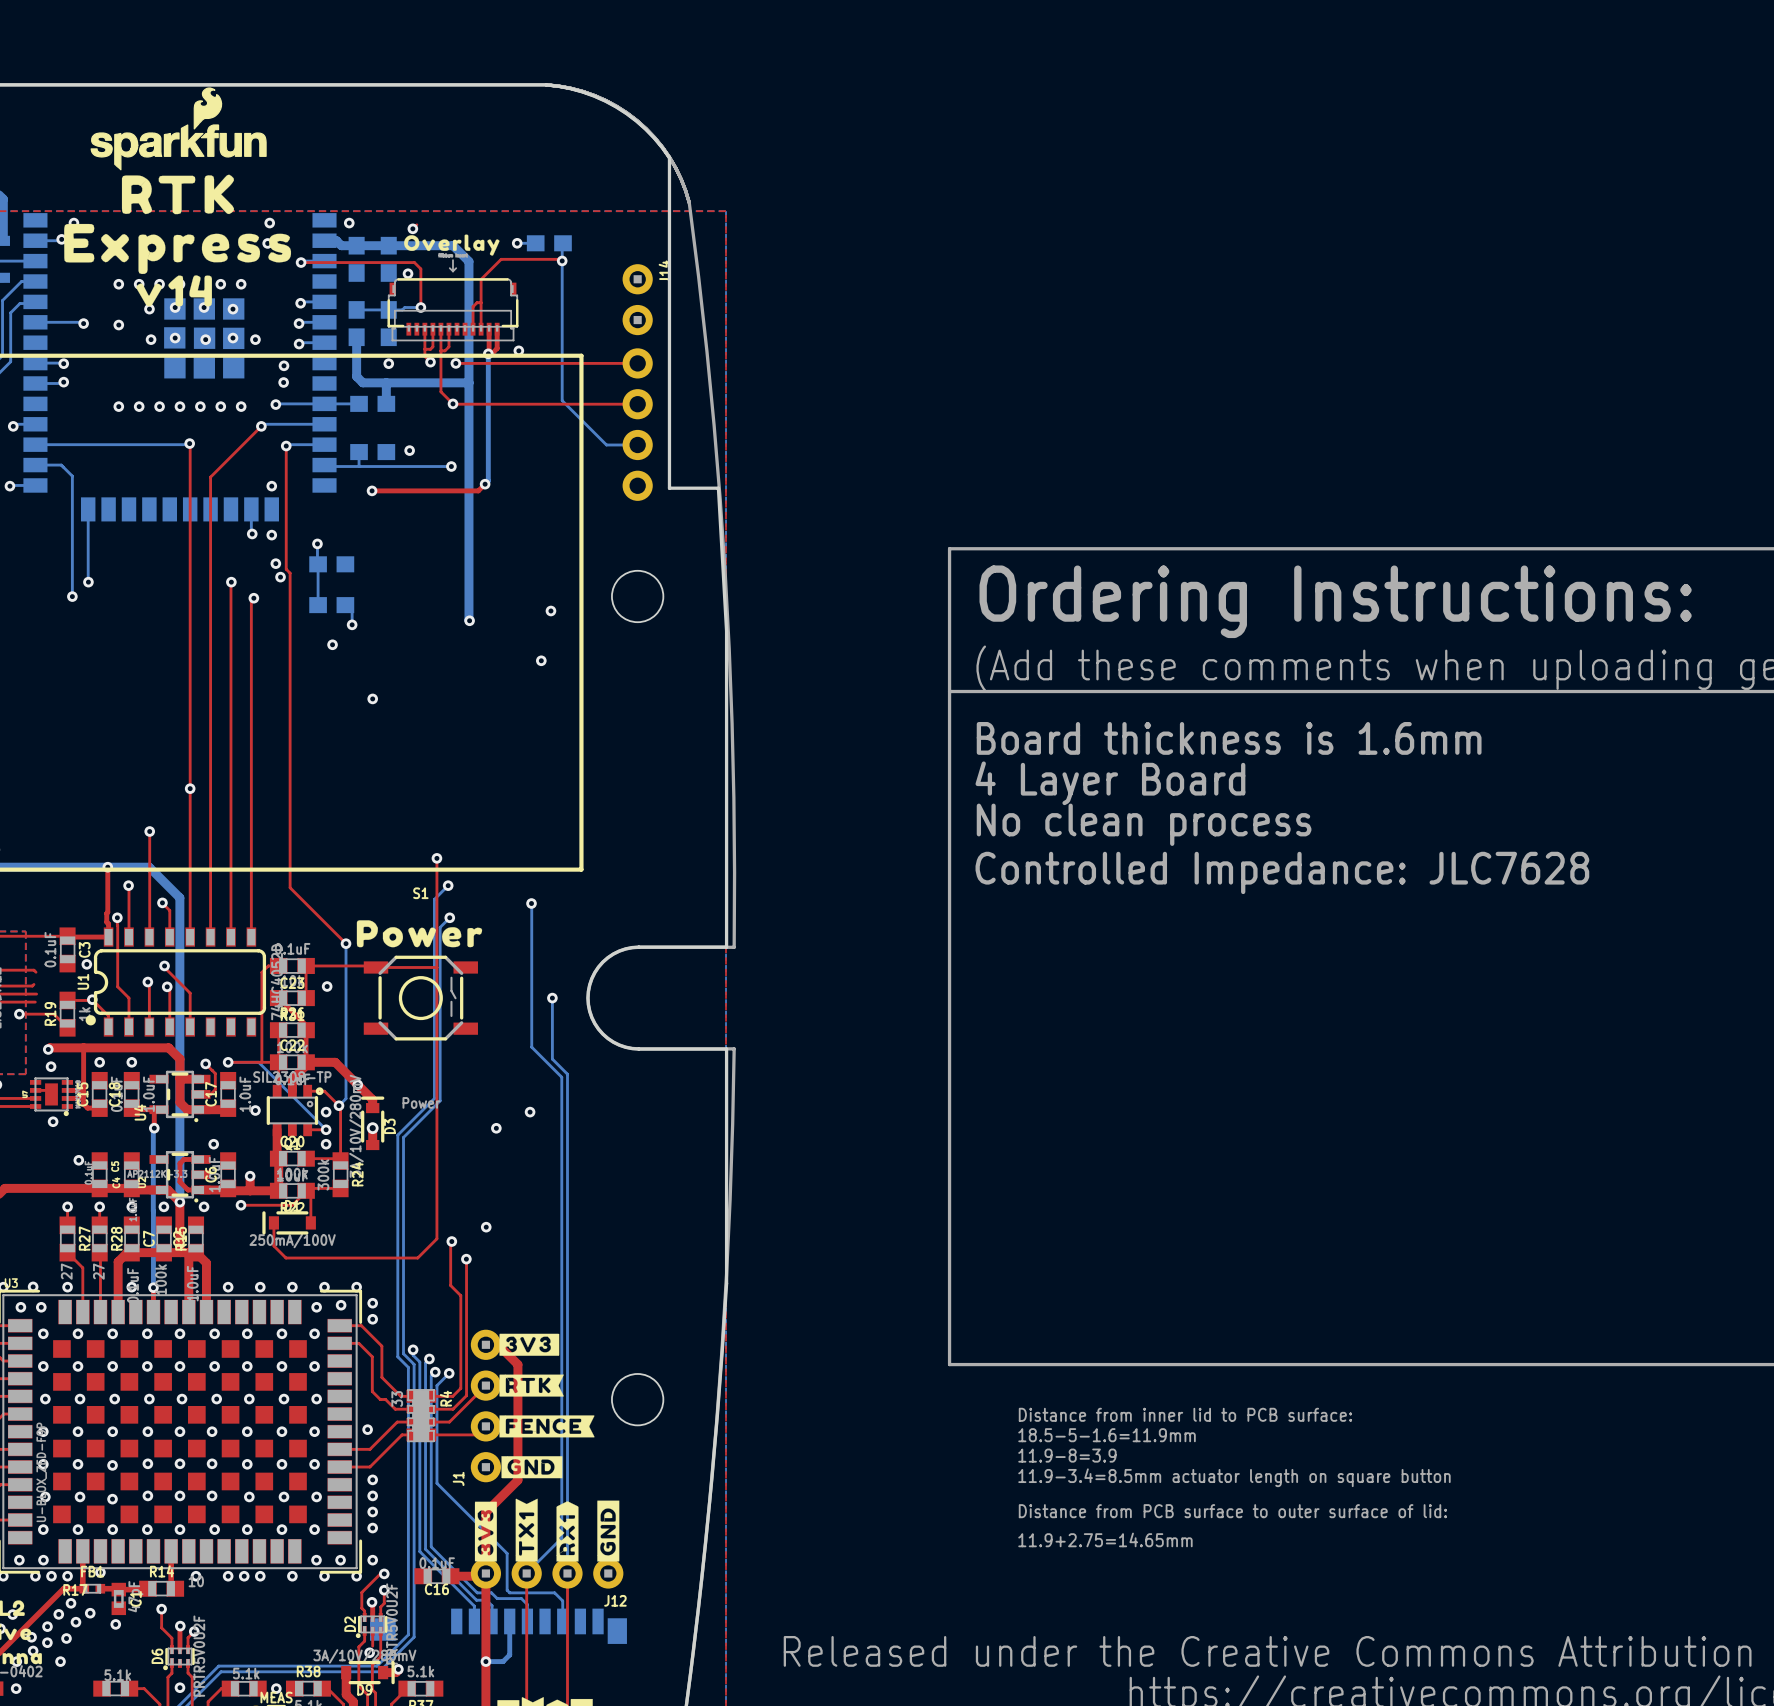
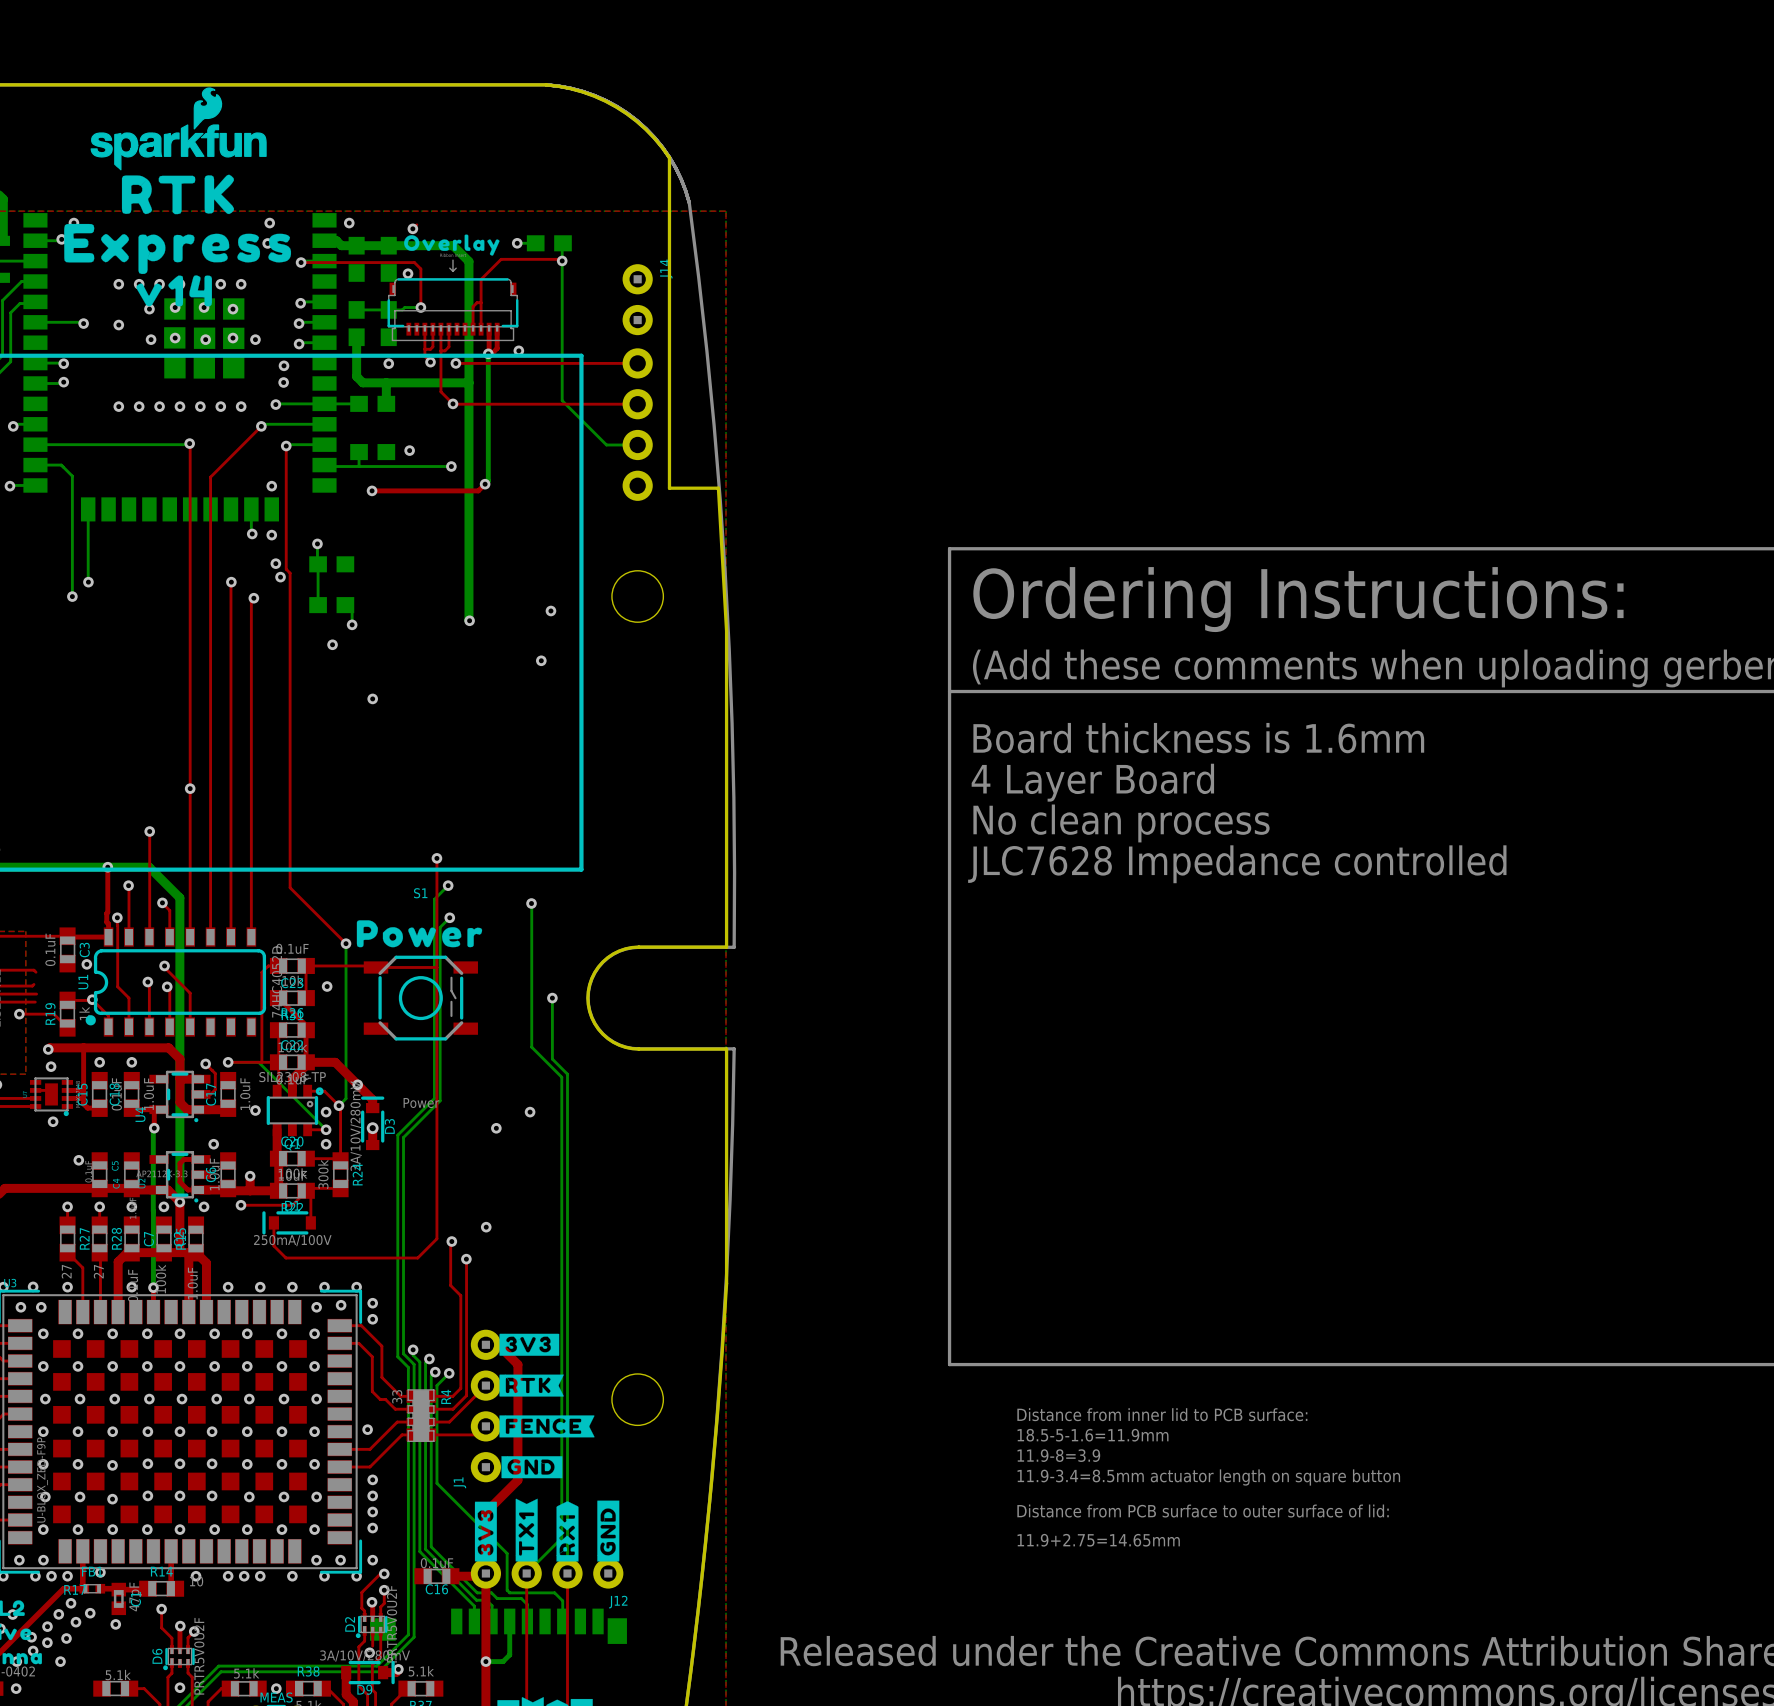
text: Controlled Impedance: JLC7628 (1282, 872) -> JLC7628 Impedance controlled (1237, 864)

